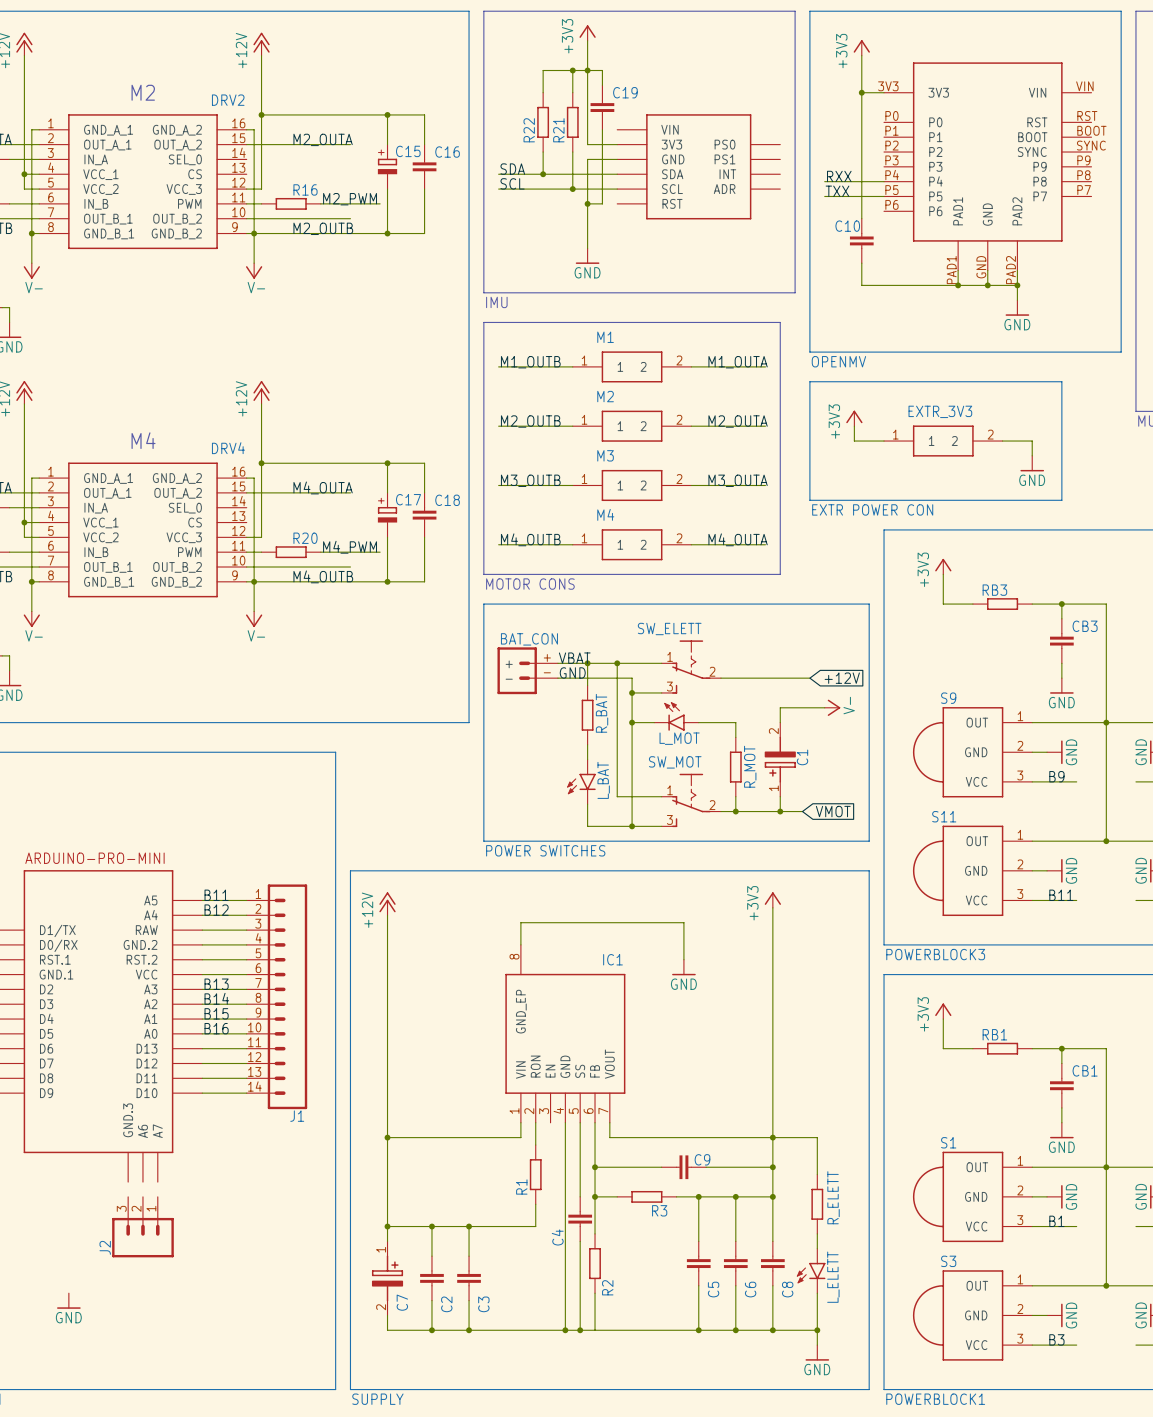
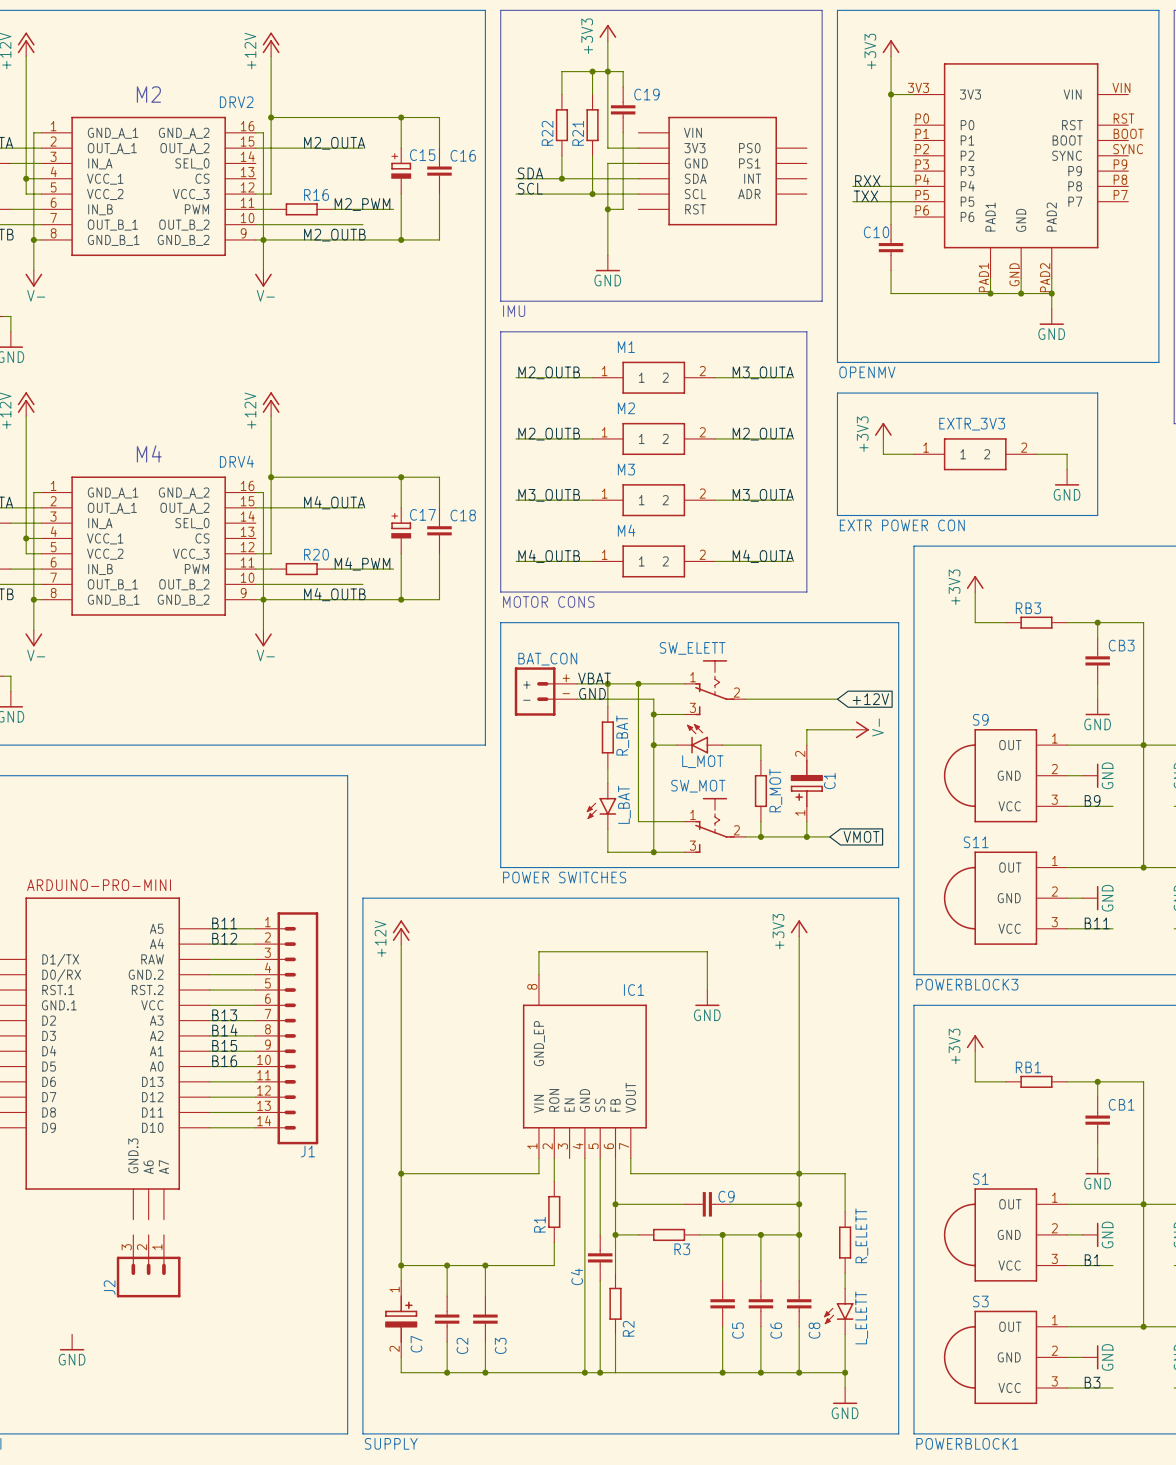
label: M1_OUTB (530, 362) -> M2_OUTB (549, 372)
label: M1_OUTA (738, 362) -> M3_OUTA (763, 372)

